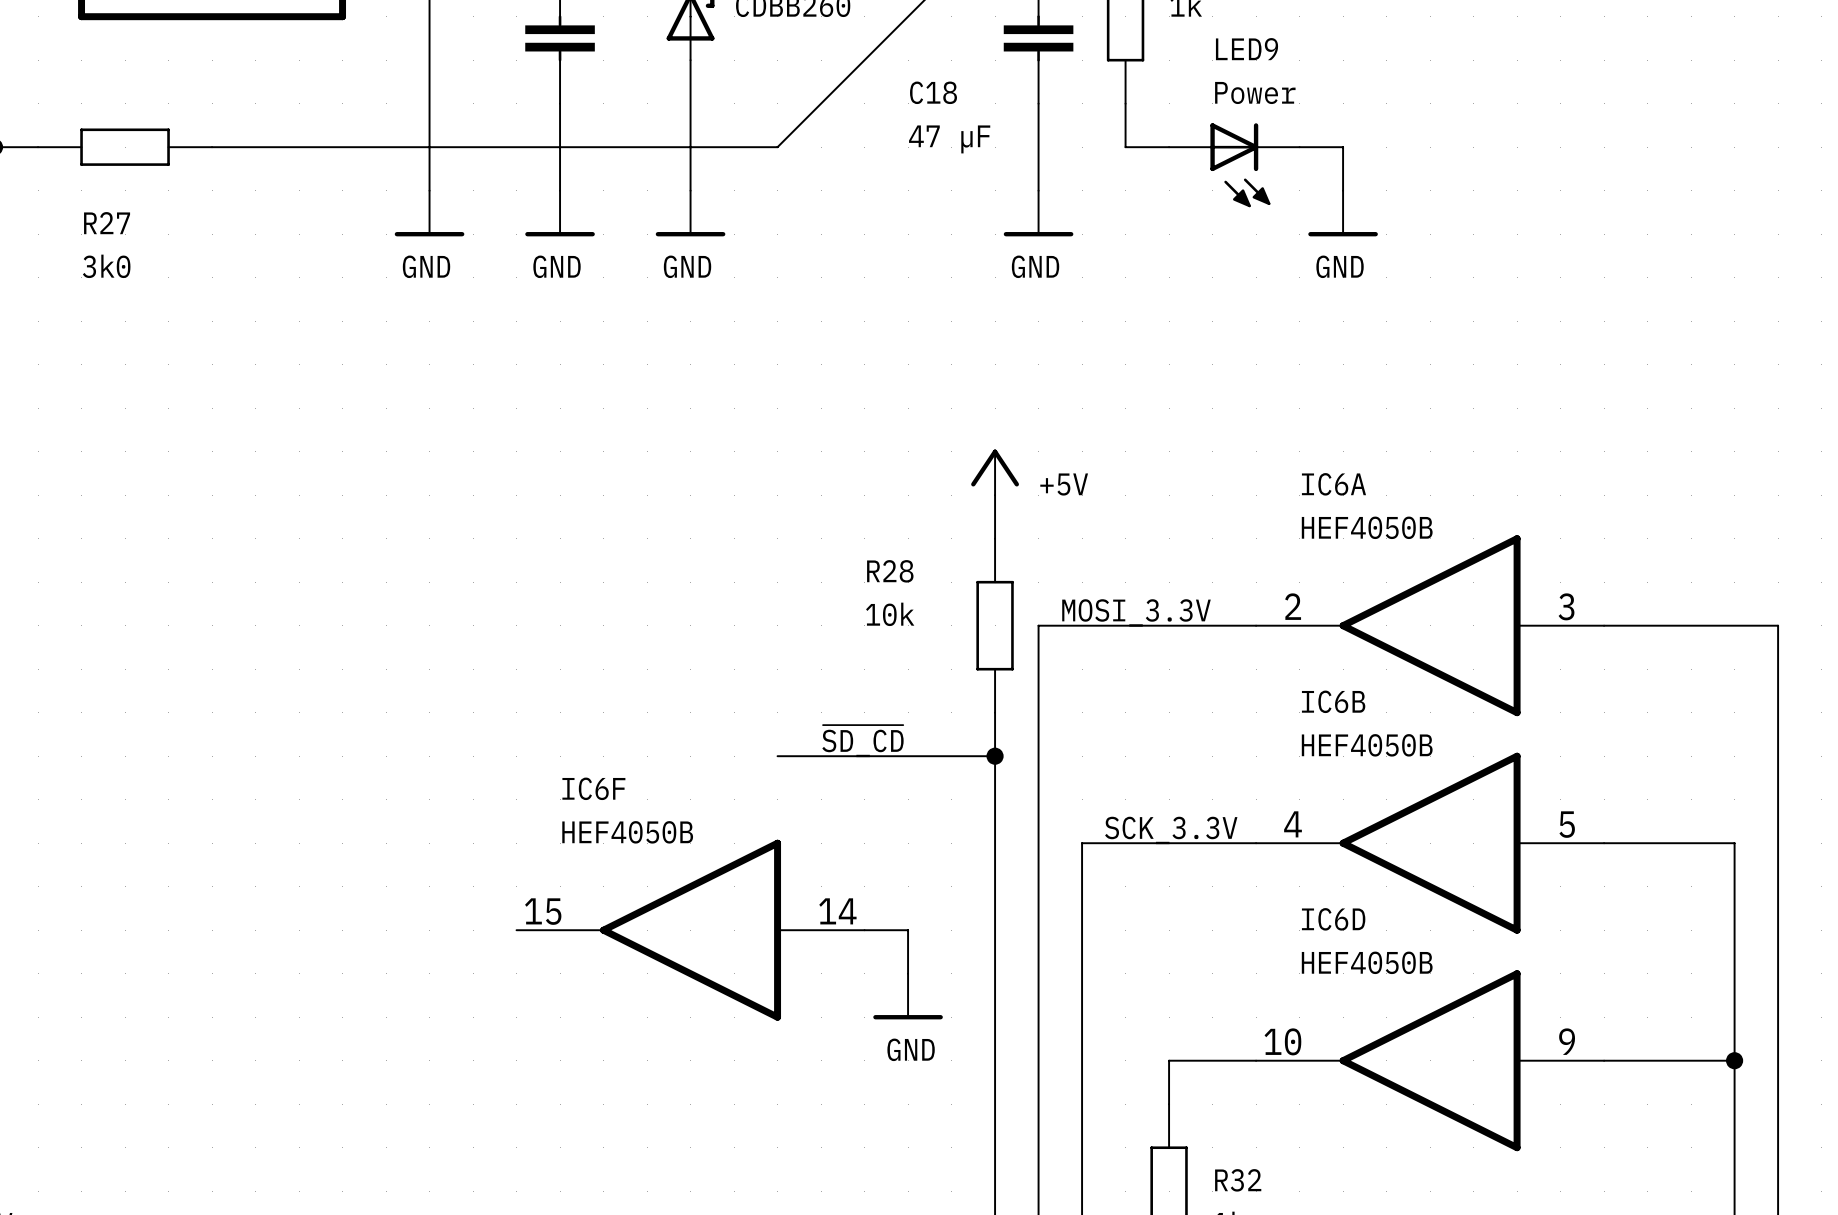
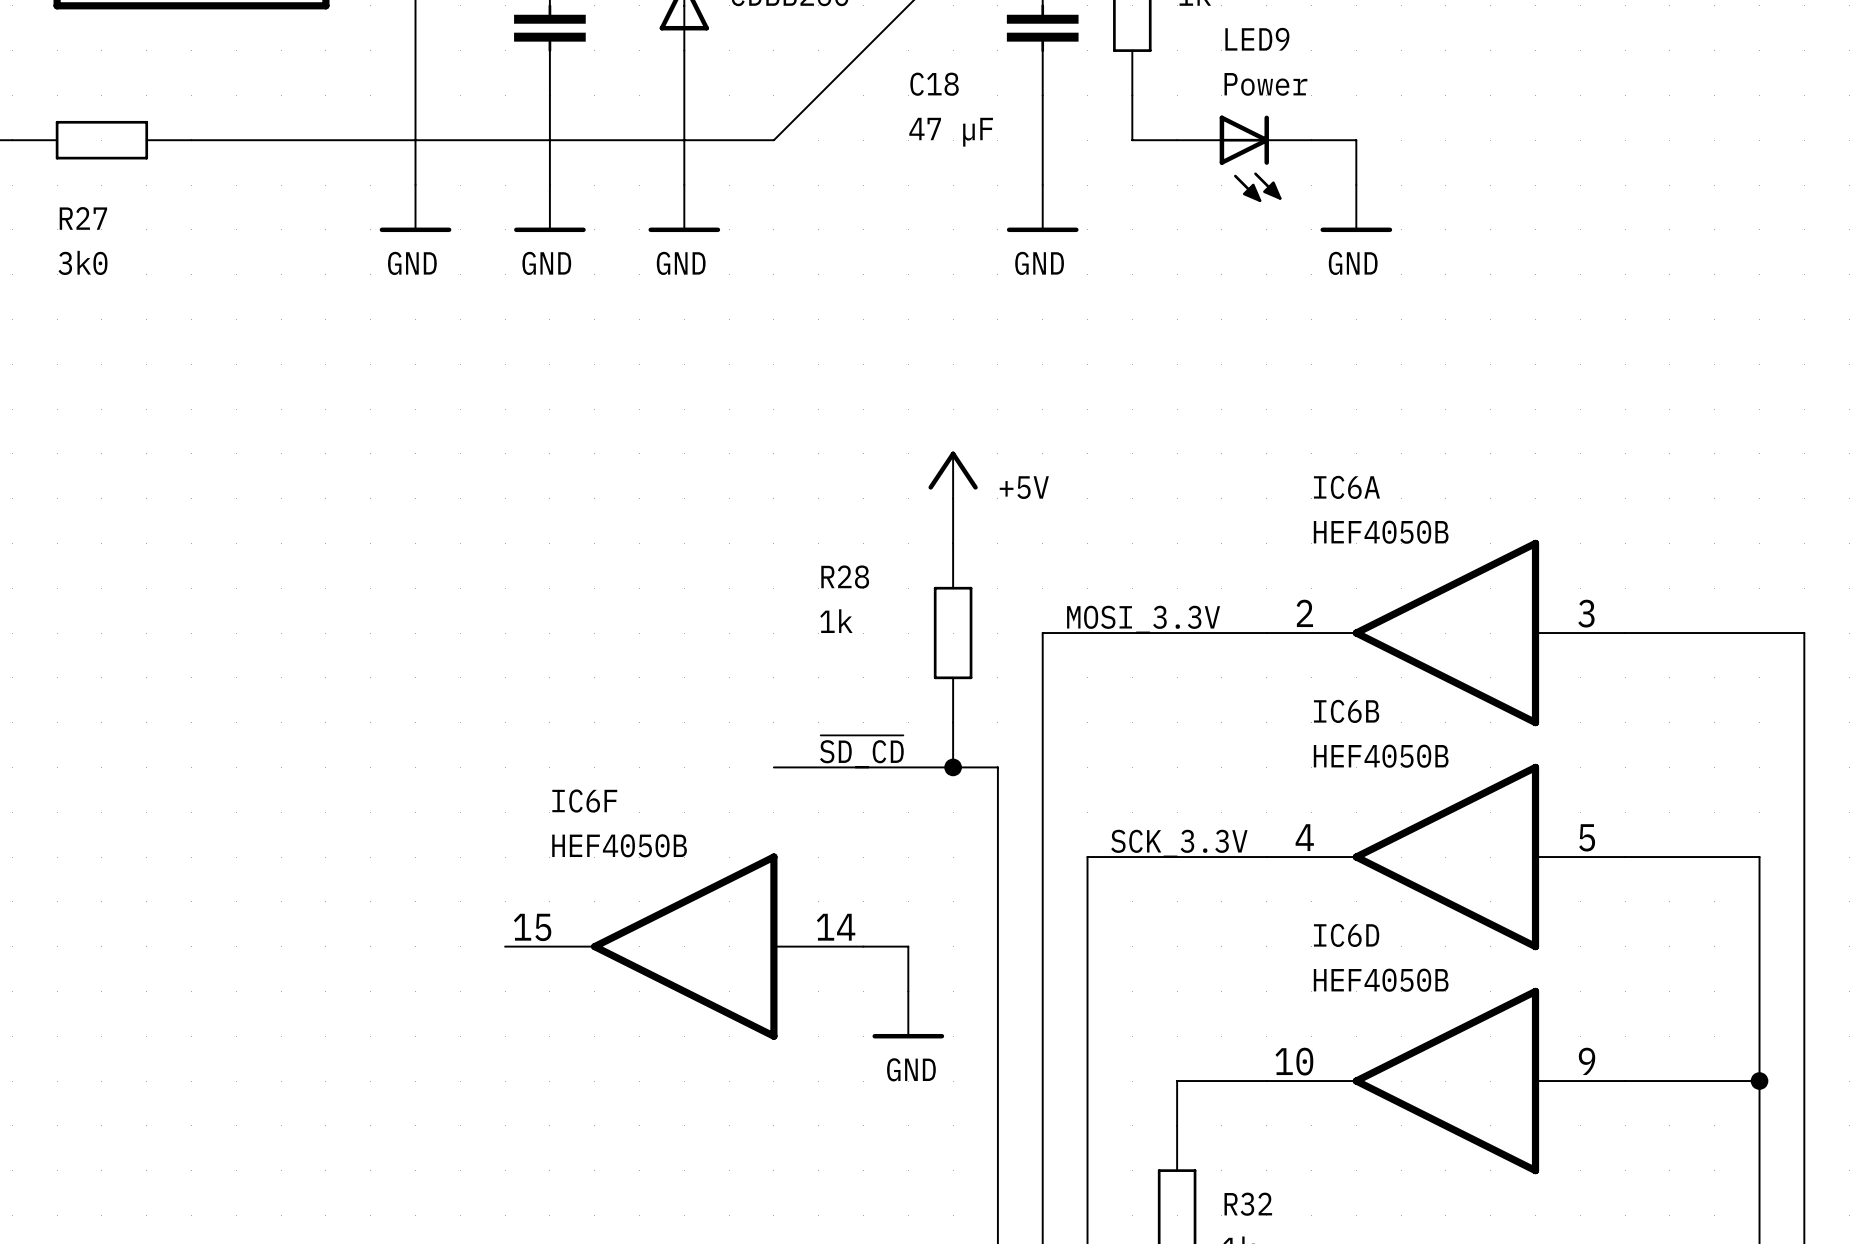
power symbol position: +5V (995, 472) -> +5V (953, 475)
wire: (995, 495) (995, 538) -> (953, 498) (953, 543)
R28 value: 10k (890, 614) -> 1k (836, 621)
R28 position: (995, 625) -> (953, 633)
wire: (995, 712) (995, 756) -> (953, 722) (953, 767)
junction position: (995, 756) -> (953, 767)

